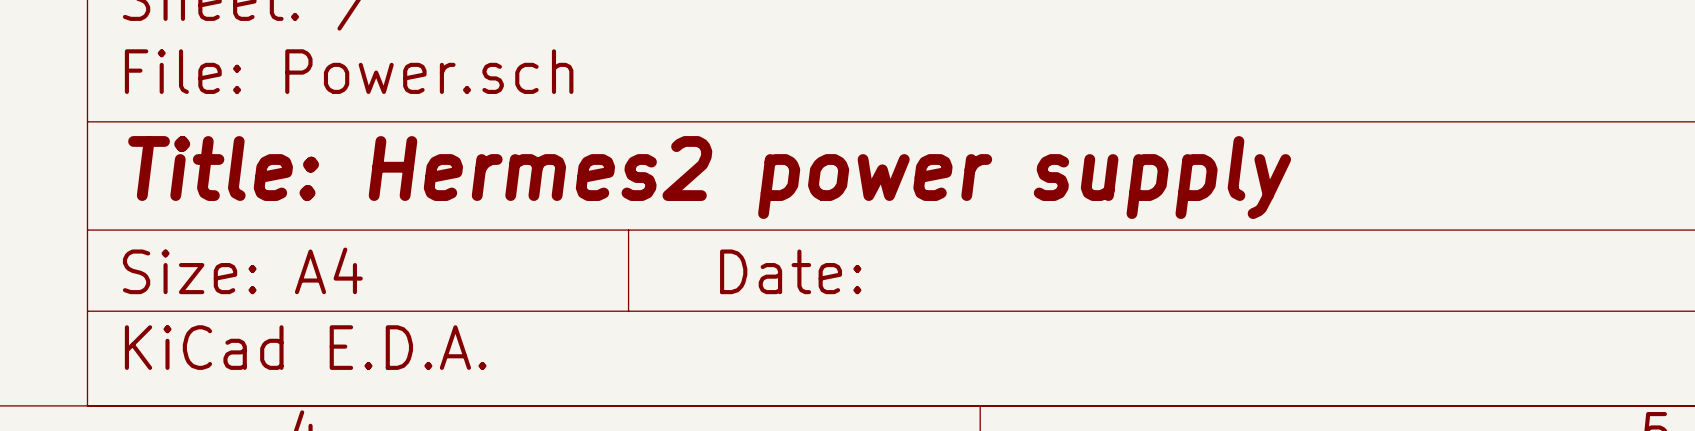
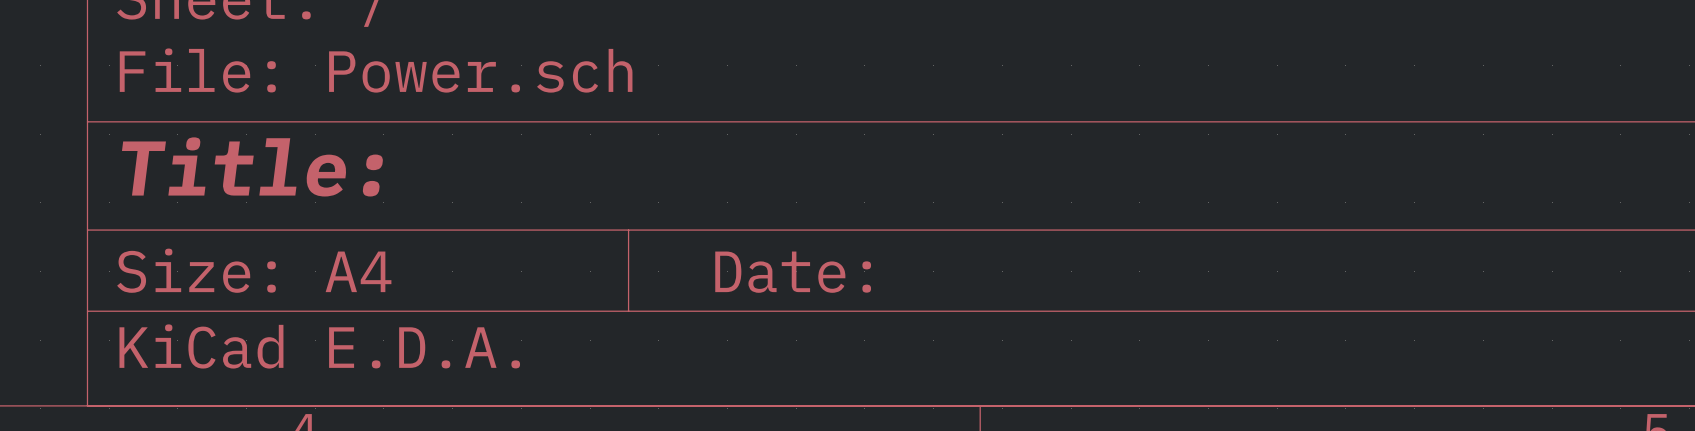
title block: Title: Hermes2 power supply (709, 177) -> Title: (252, 166)

